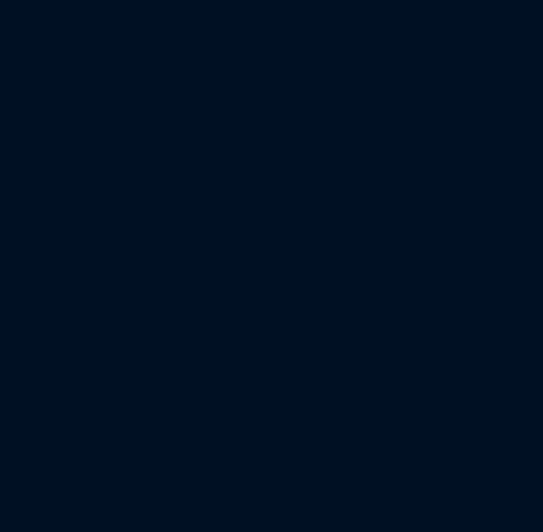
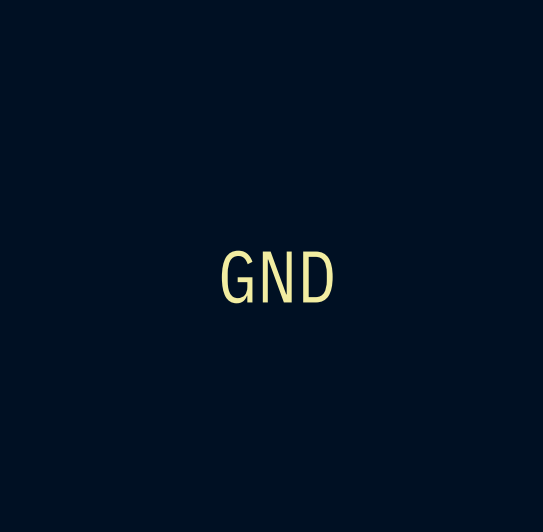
text: none -> GND (277, 276)

